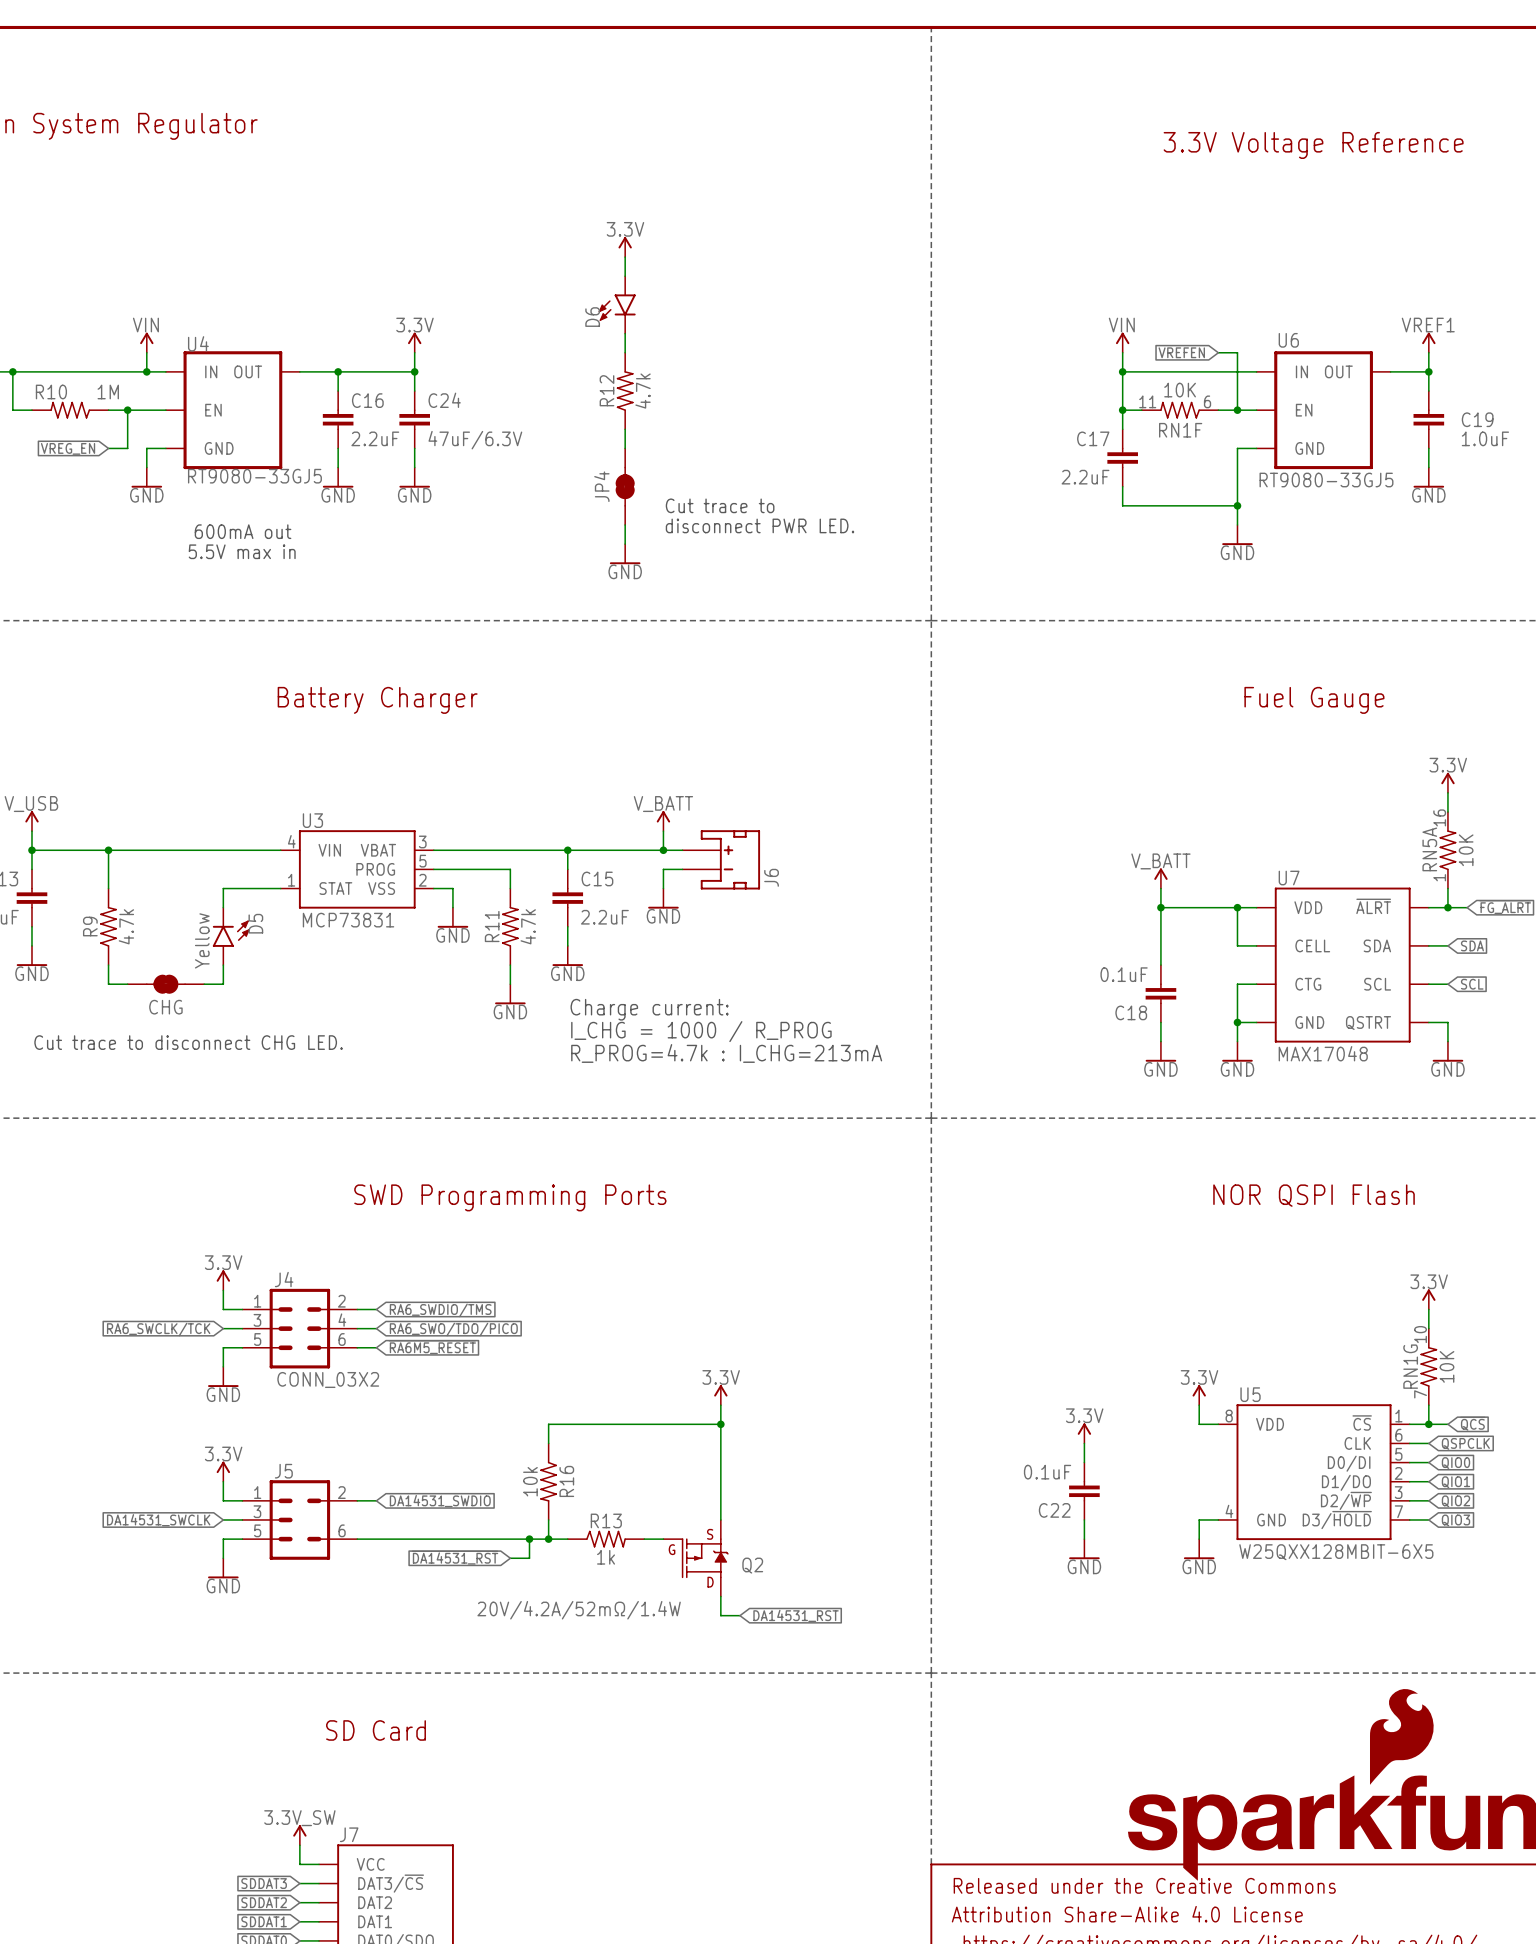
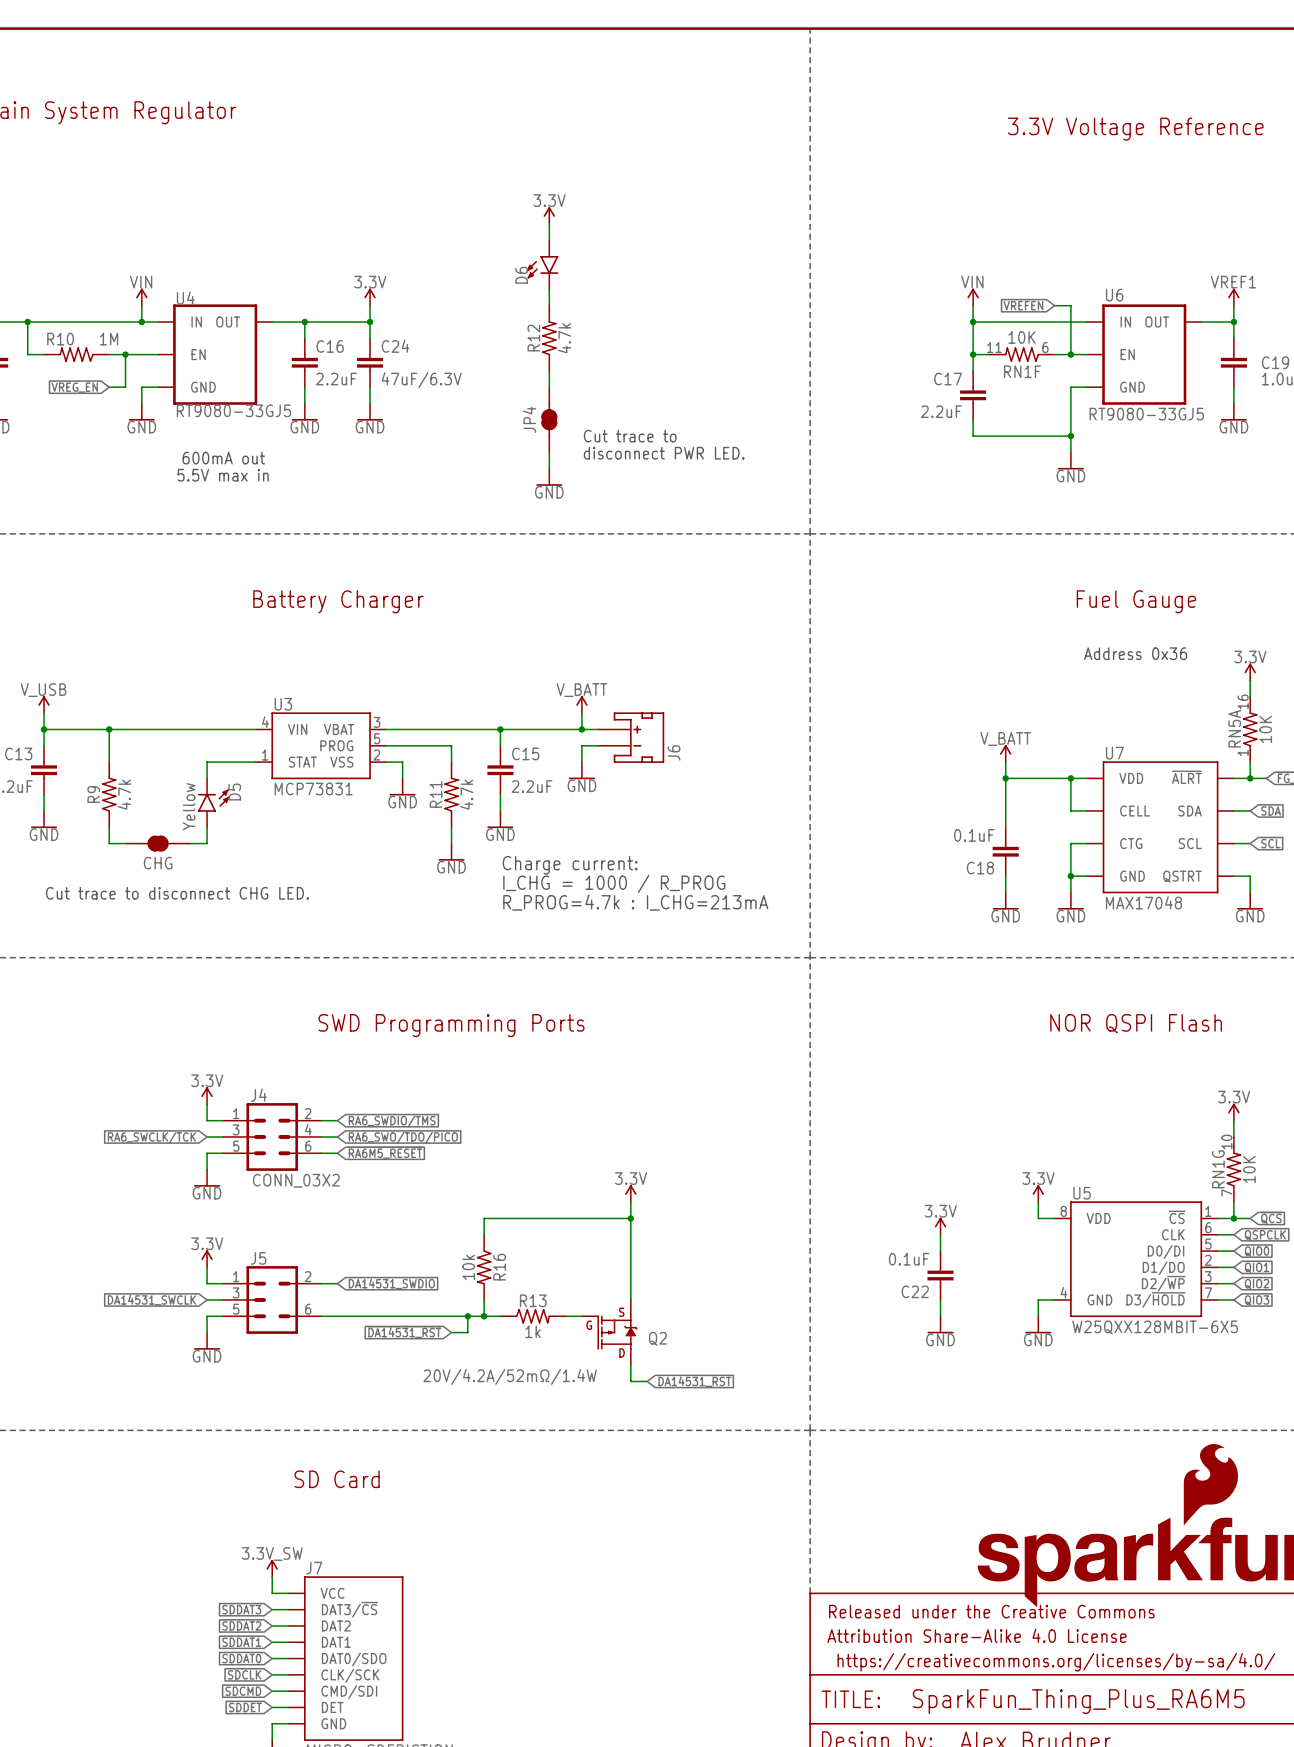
text: none -> Address 0x36 (1135, 653)

